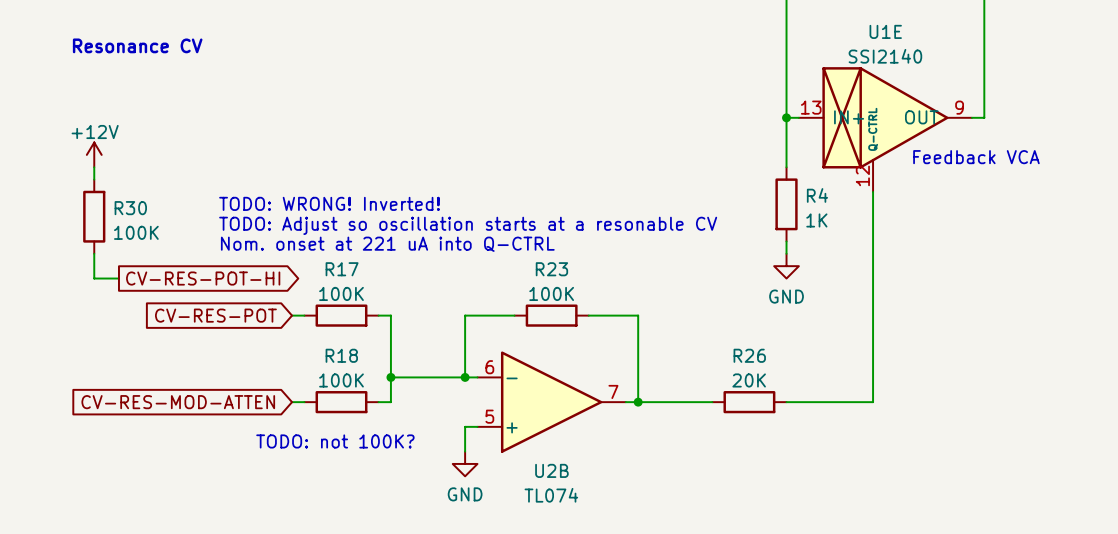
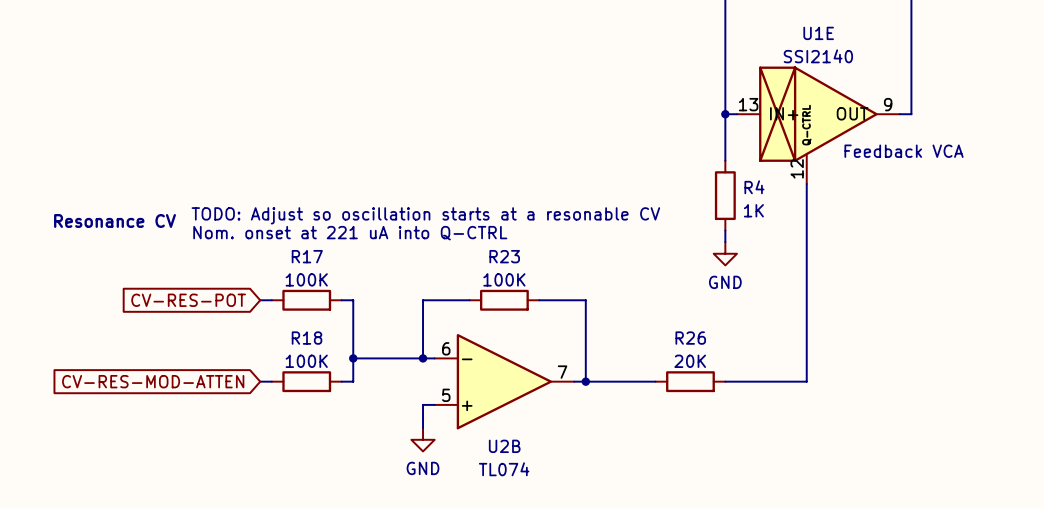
text position: Resonance CV (137, 45) -> Resonance CV (115, 220)
power symbol: +12V (94, 154) -> none
wire: (94, 167) (94, 179) -> none
text: TODO: WRONG! Inverted! (329, 203) -> none
R30: 100K (94, 216) -> none
wire: (94, 253) (94, 278) (118, 278) -> none
global label: CV-RES-POT-HI (203, 278) -> none
text: TODO: not 100K? (335, 441) -> none

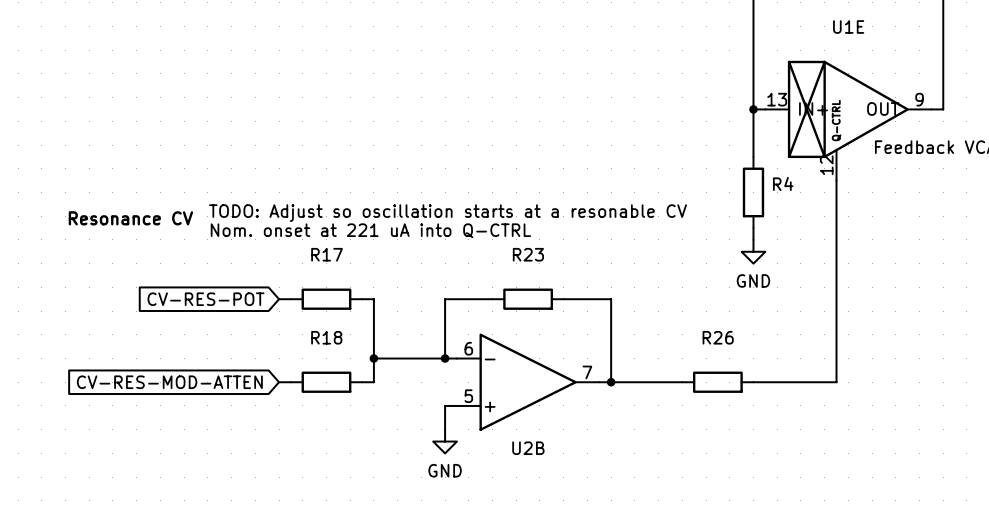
U1E value: SSI2140 (818, 56) -> none
R4 value: 1K (753, 210) -> none
R17 value: 100K (306, 279) -> none
R23 value: 100K (504, 279) -> none
R18 value: 100K (306, 361) -> none
R26 value: 20K (690, 361) -> none
U2B value: TL074 (504, 469) -> none

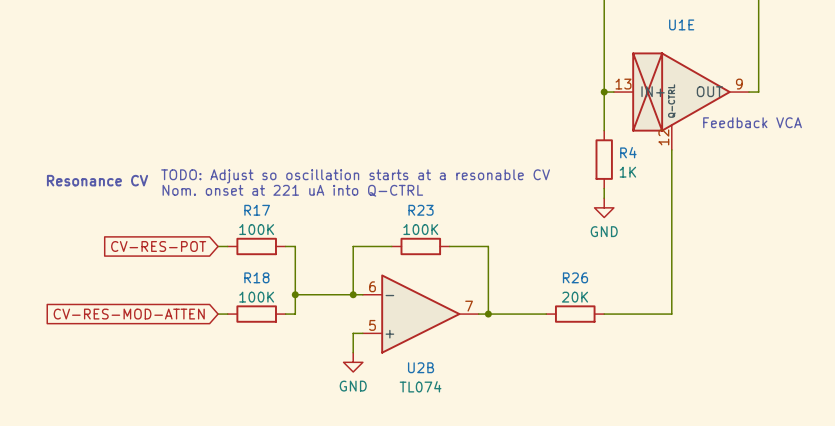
R4 value: none -> 1K (627, 172)
R17 value: none -> 100K (256, 229)
R23 value: none -> 100K (420, 229)
R18 value: none -> 100K (256, 297)
R26 value: none -> 20K (575, 297)
U2B value: none -> TL074 (420, 386)

